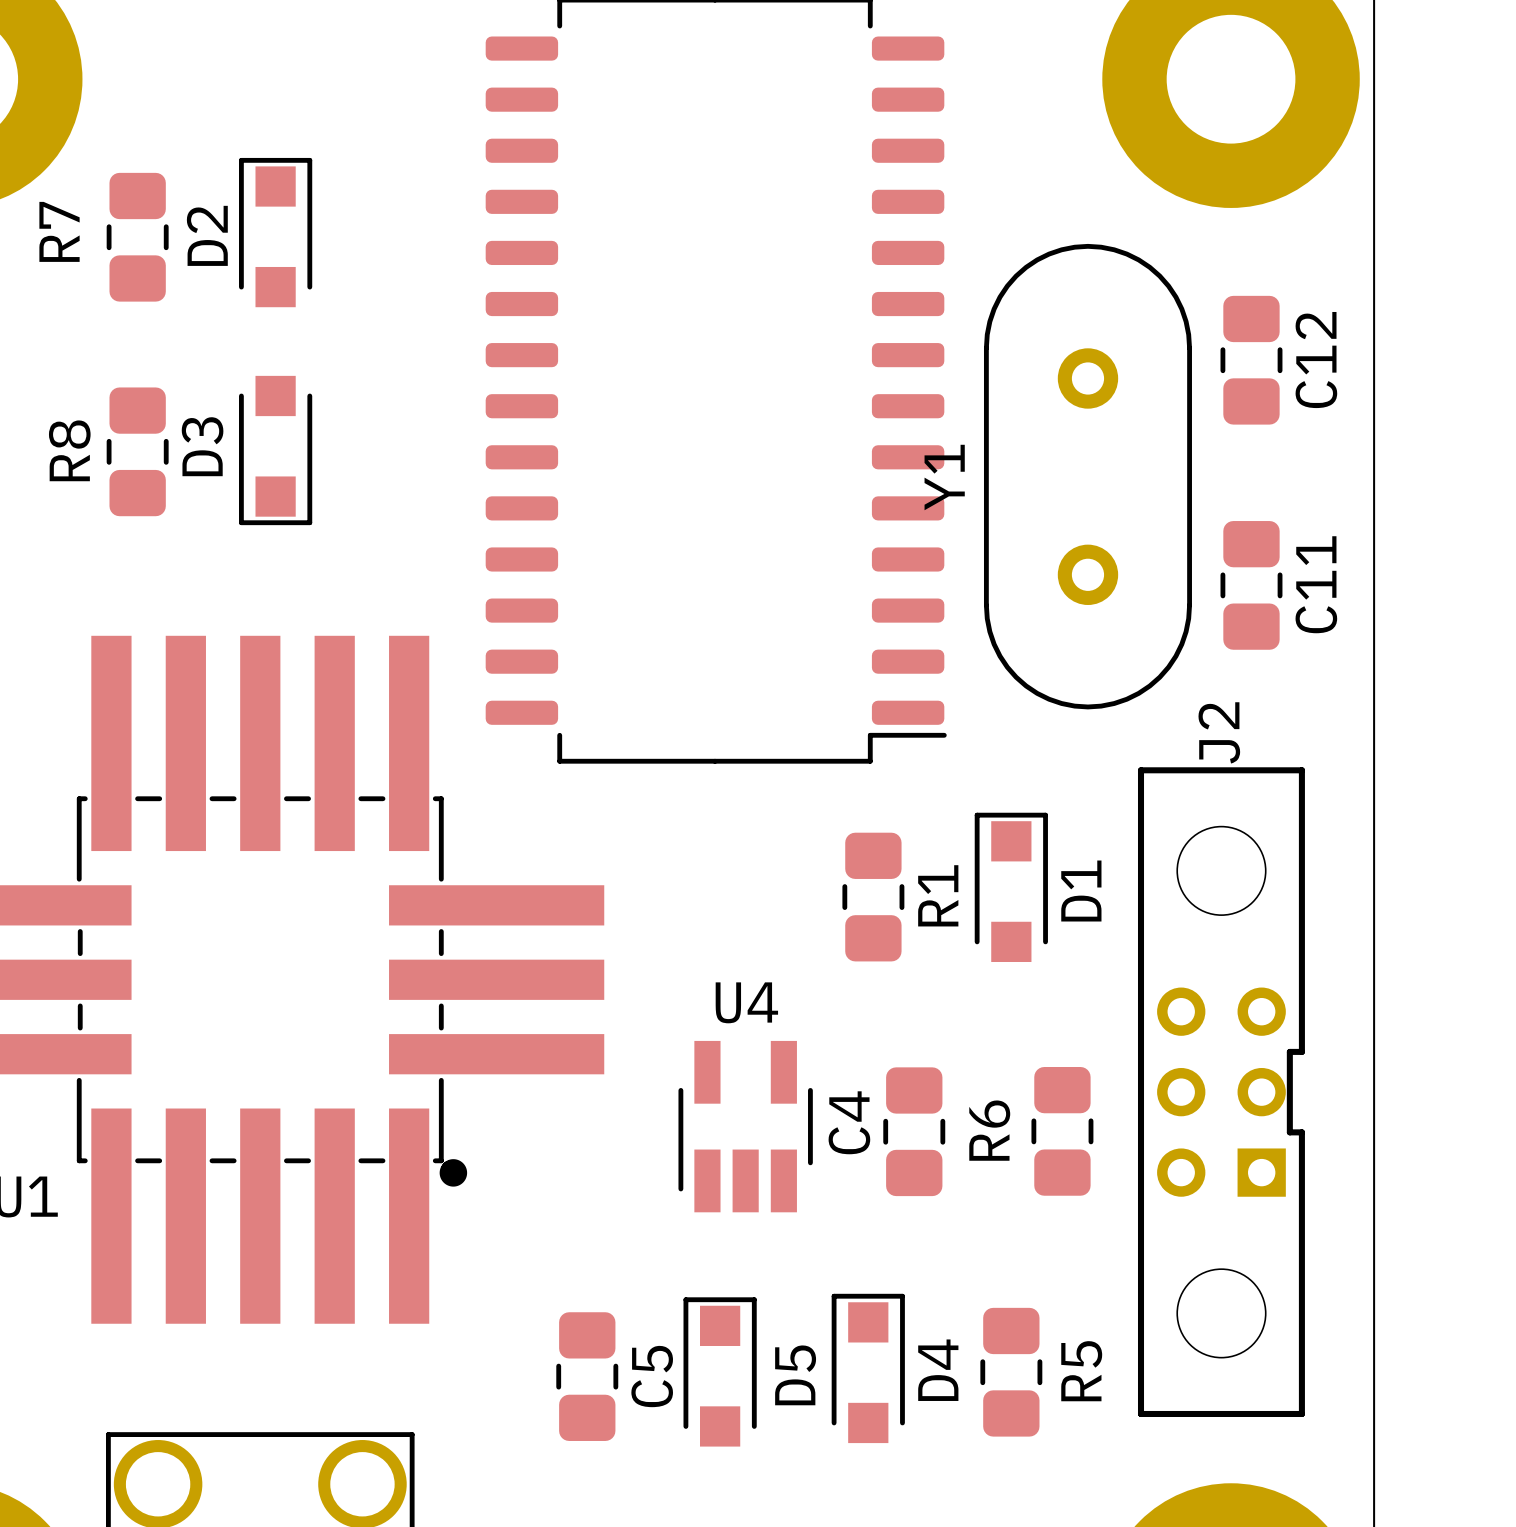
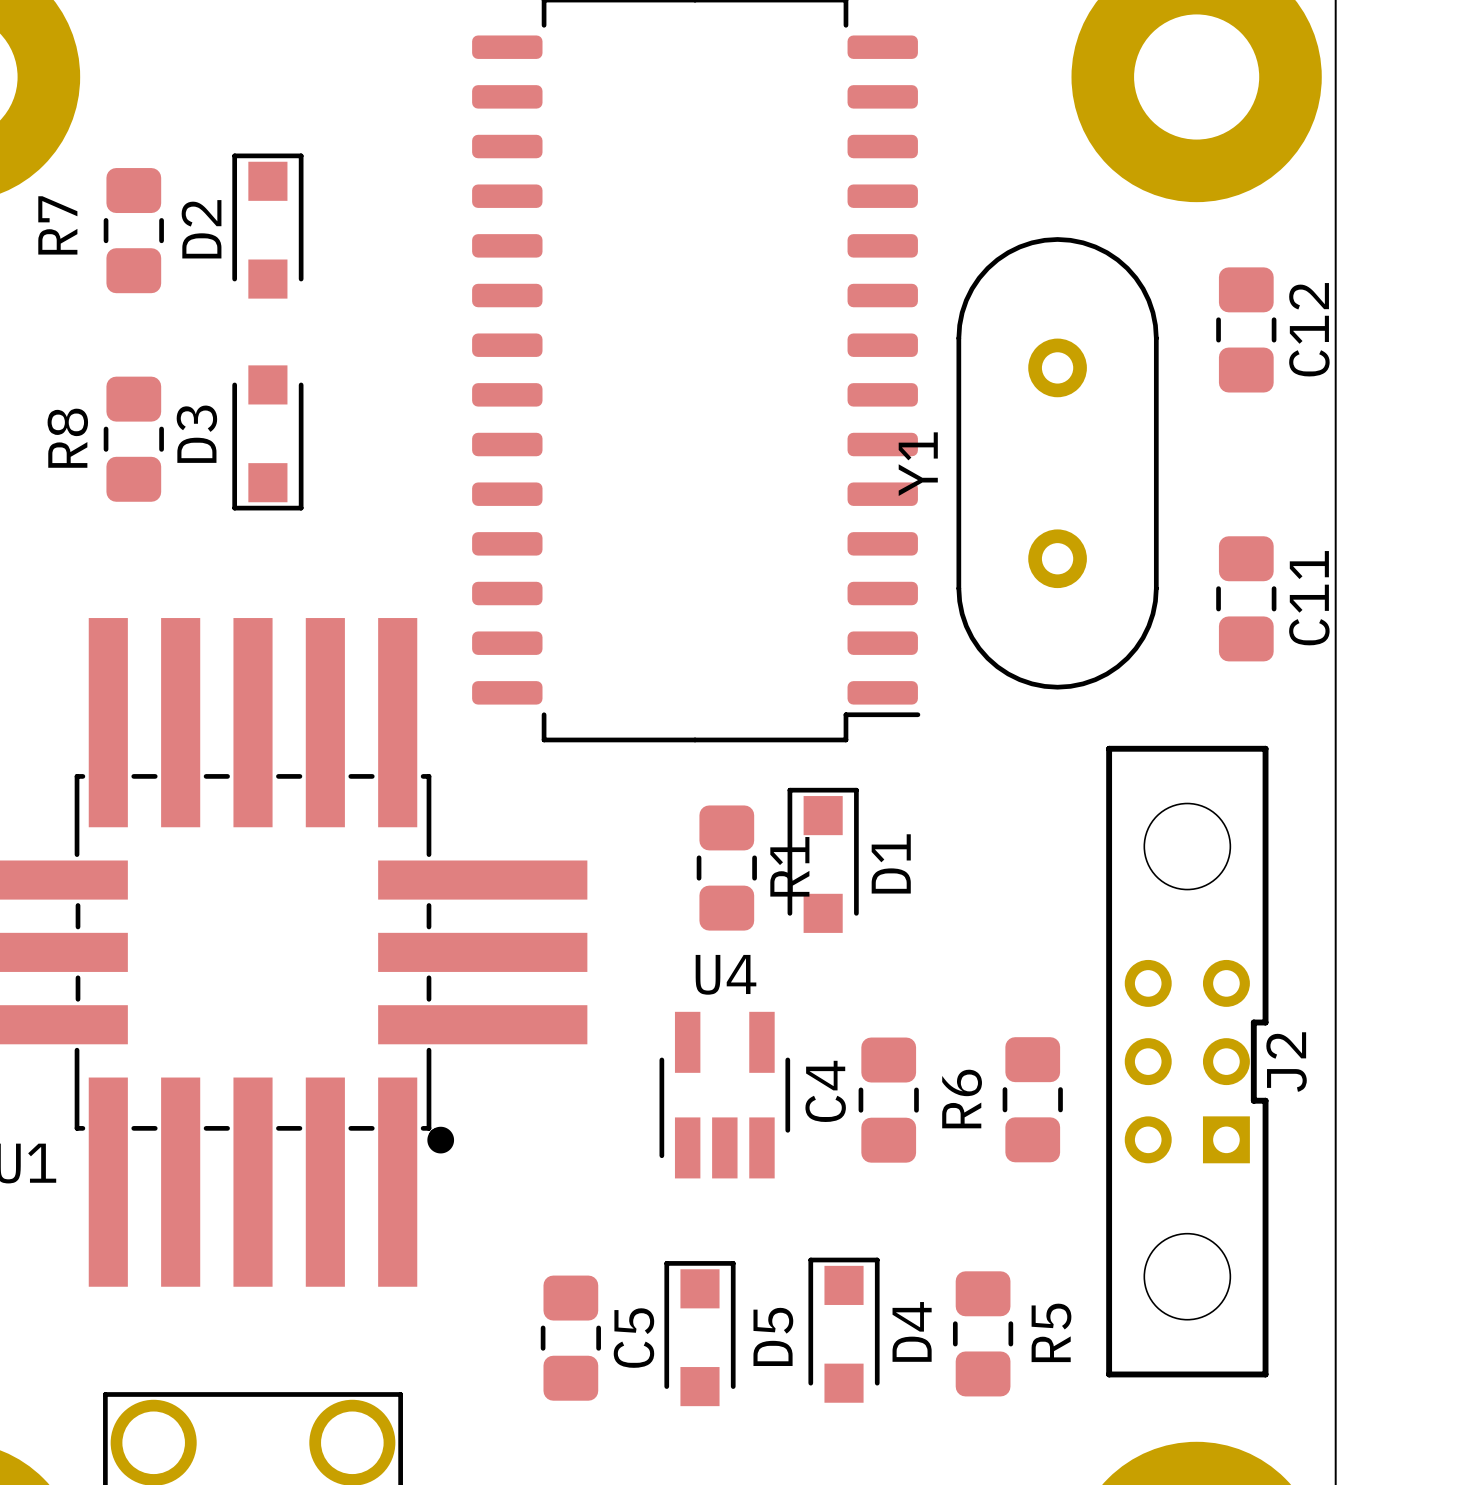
C12 position: (1251, 360) -> (1246, 329)
C11 position: (1251, 585) -> (1246, 598)
J2 name position: J2 (1219, 732) -> J2 (1286, 1062)
D1 position: (1011, 887) -> (823, 860)
R1 position: (873, 897) -> (726, 868)

